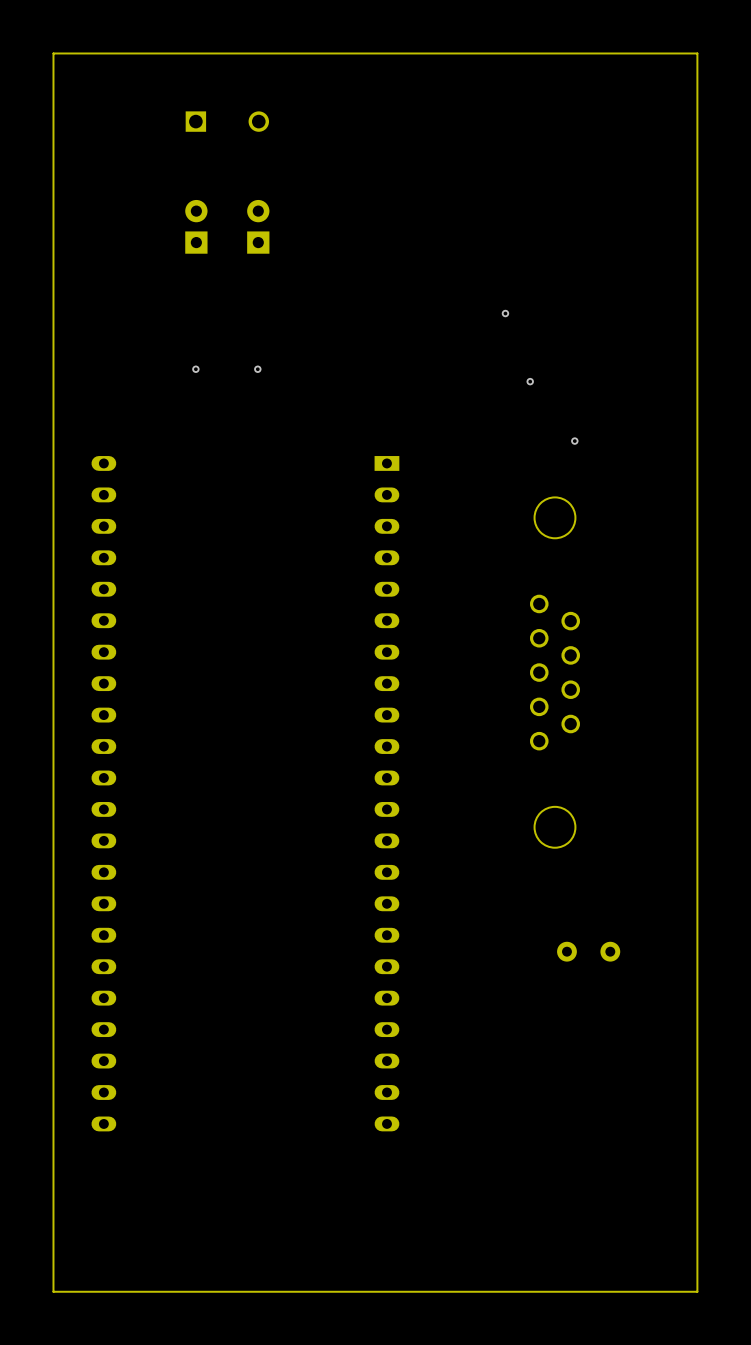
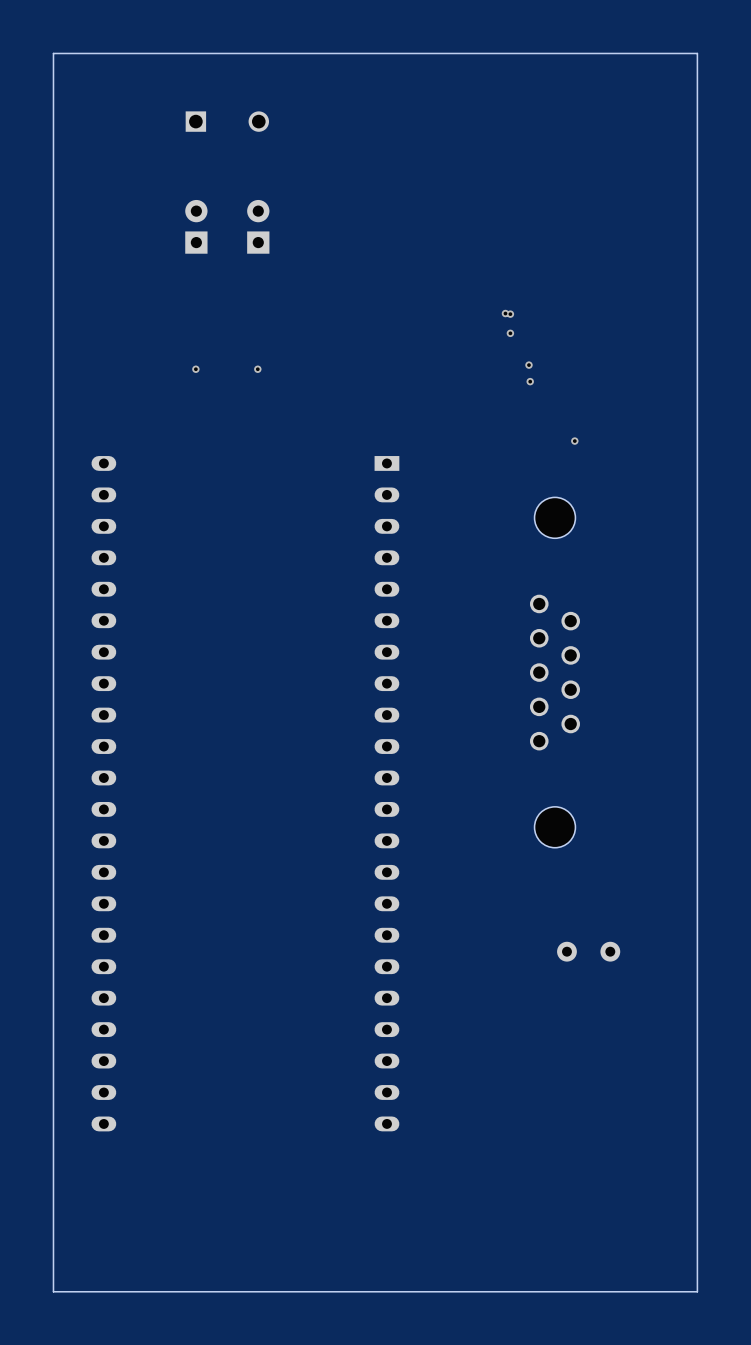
via: none -> (510, 314)
via: none -> (510, 333)
via: none -> (528, 365)

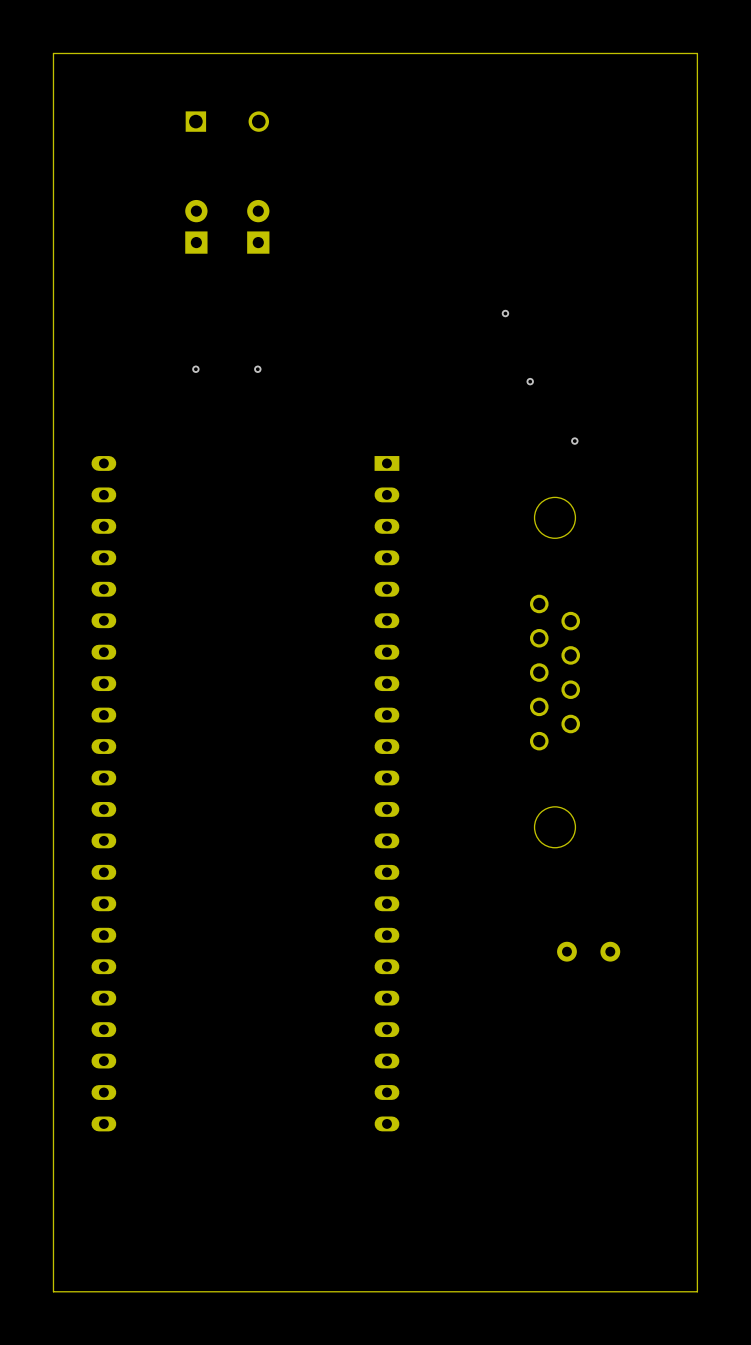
via: (510, 314) -> none
via: (510, 333) -> none
via: (528, 365) -> none

